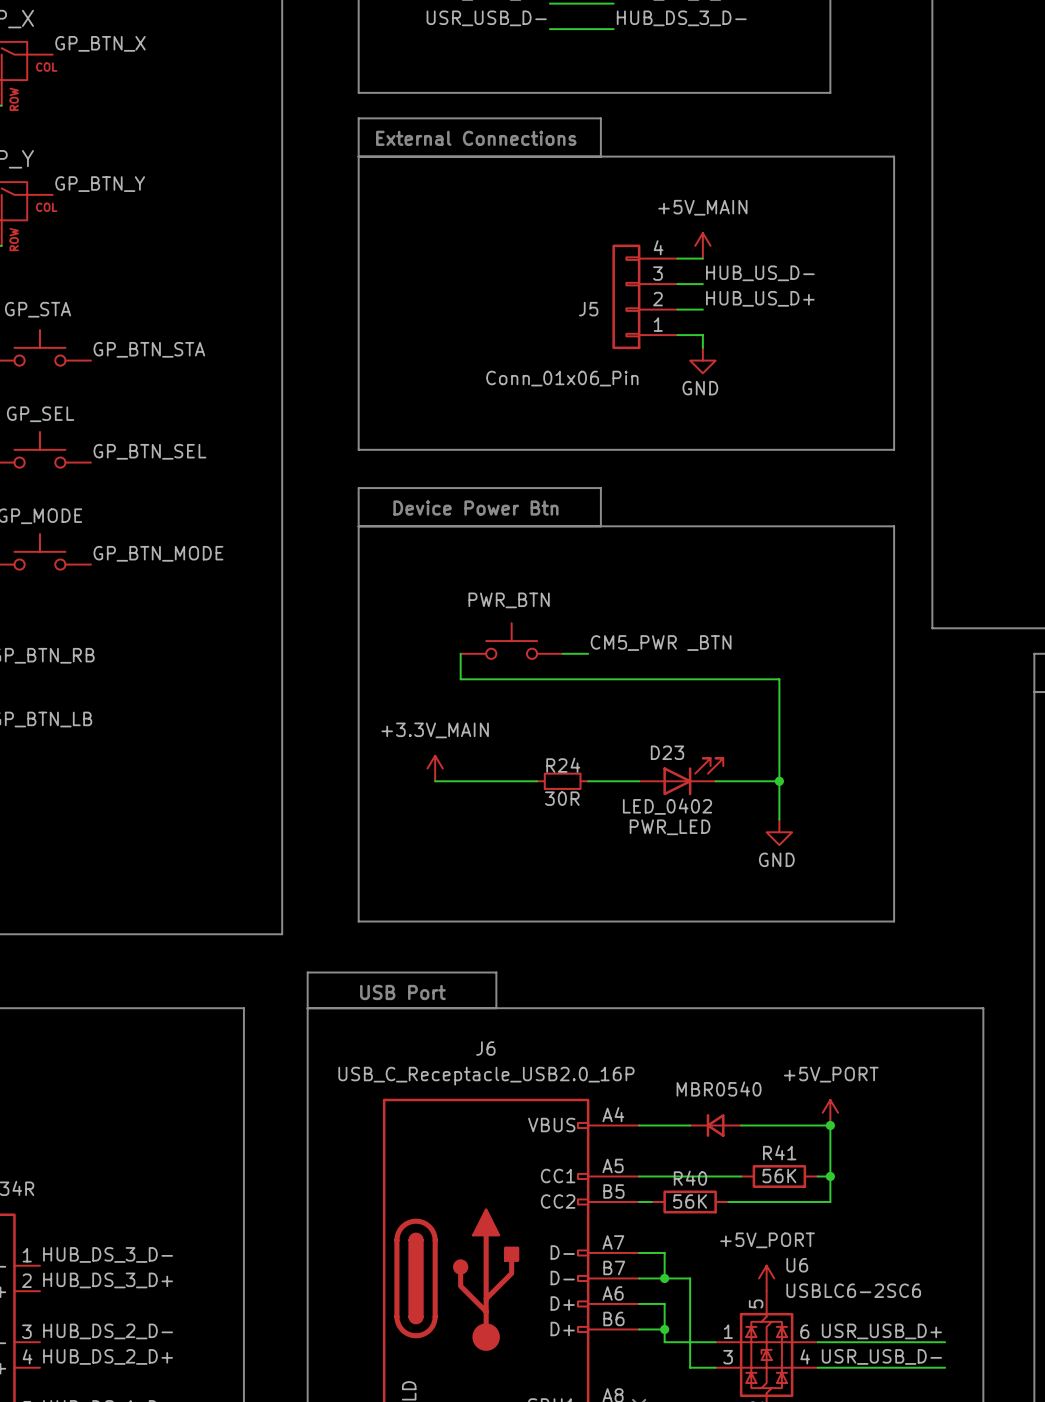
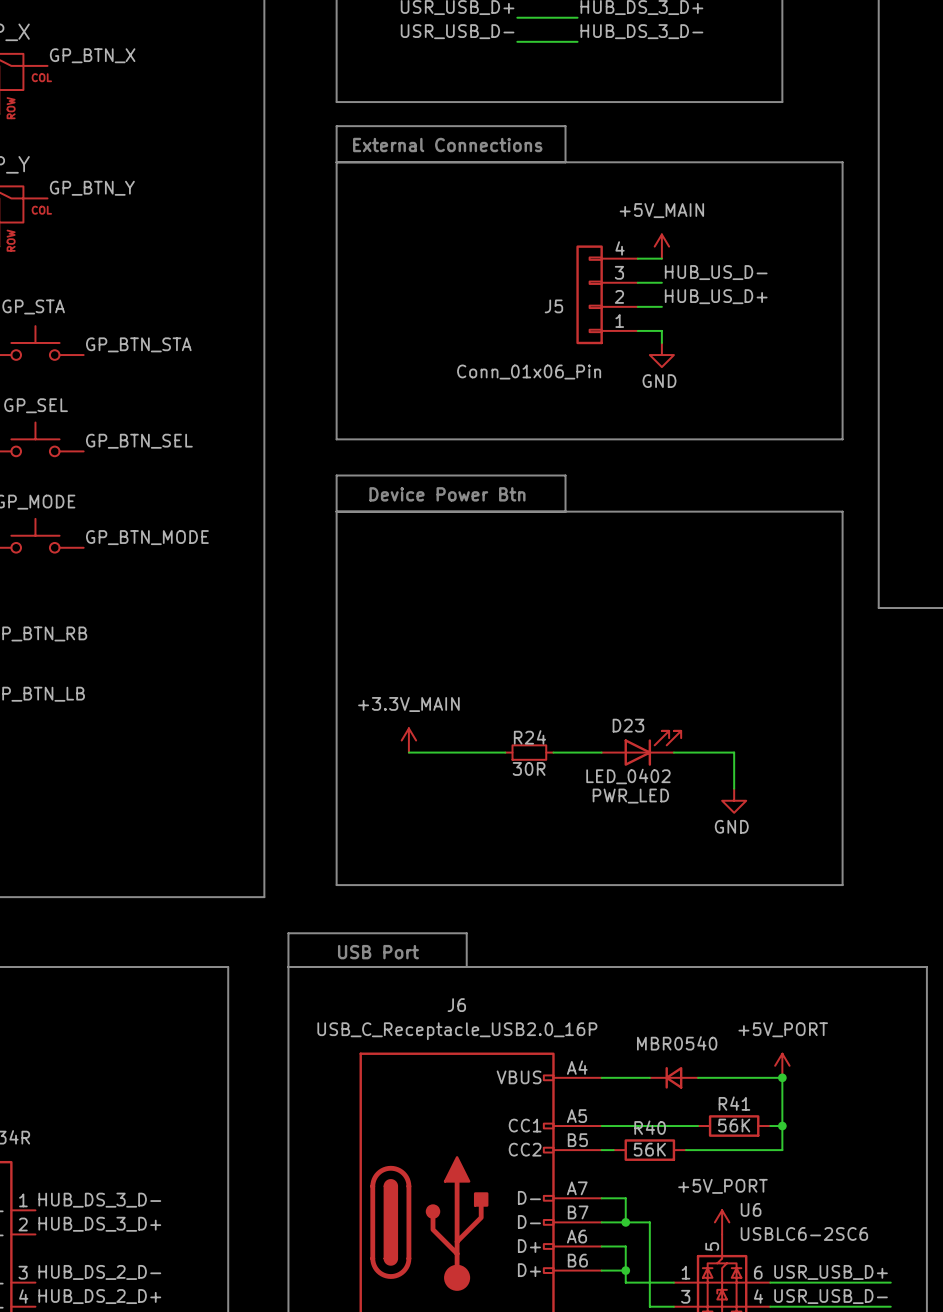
part: (511, 641) -> none
label: CM5_PWR _BTN (661, 643) -> none
wire: (460, 653) (460, 679) (779, 679) (779, 781) -> none
wire: (562, 653) (588, 653) -> none
junction: (779, 781) -> none

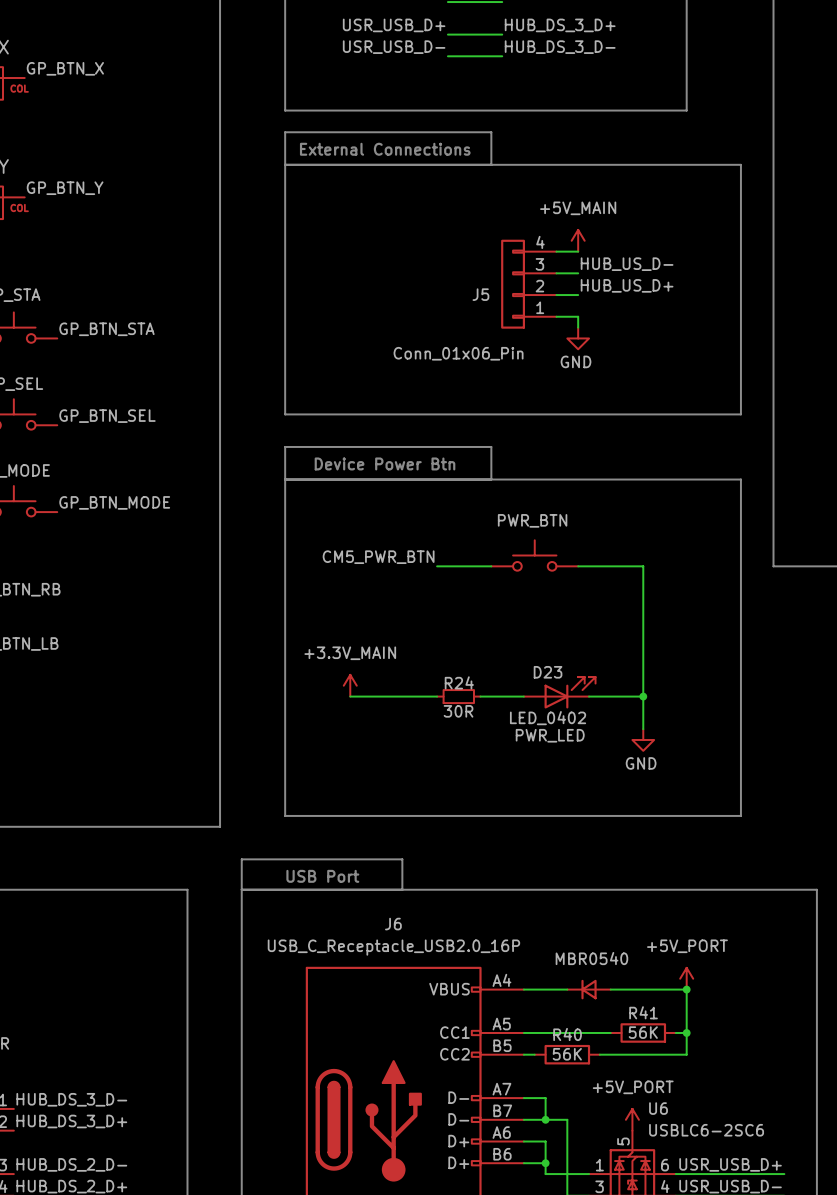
part: none -> (534, 555)
label: none -> CM5_PWR_BTN (378, 557)
wire: none -> (437, 566) (491, 566)
wire: none -> (578, 566) (643, 566) (643, 696)
junction: none -> (643, 696)

